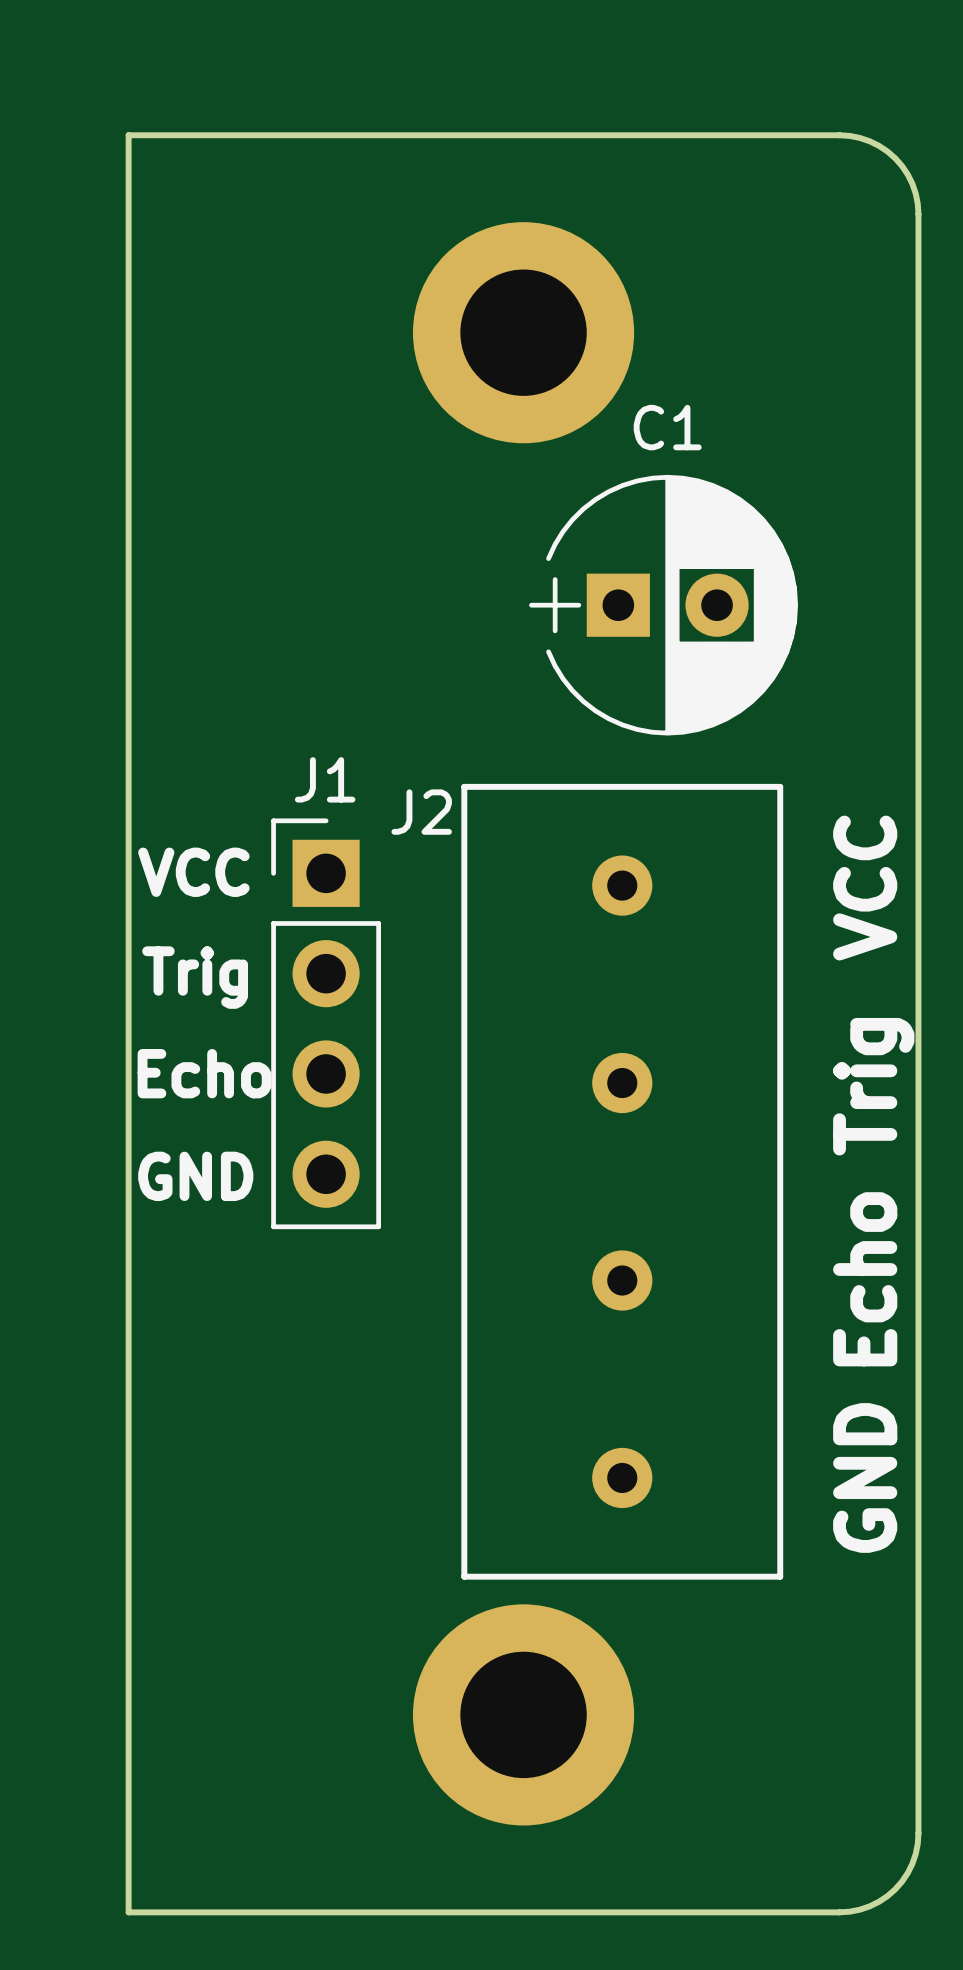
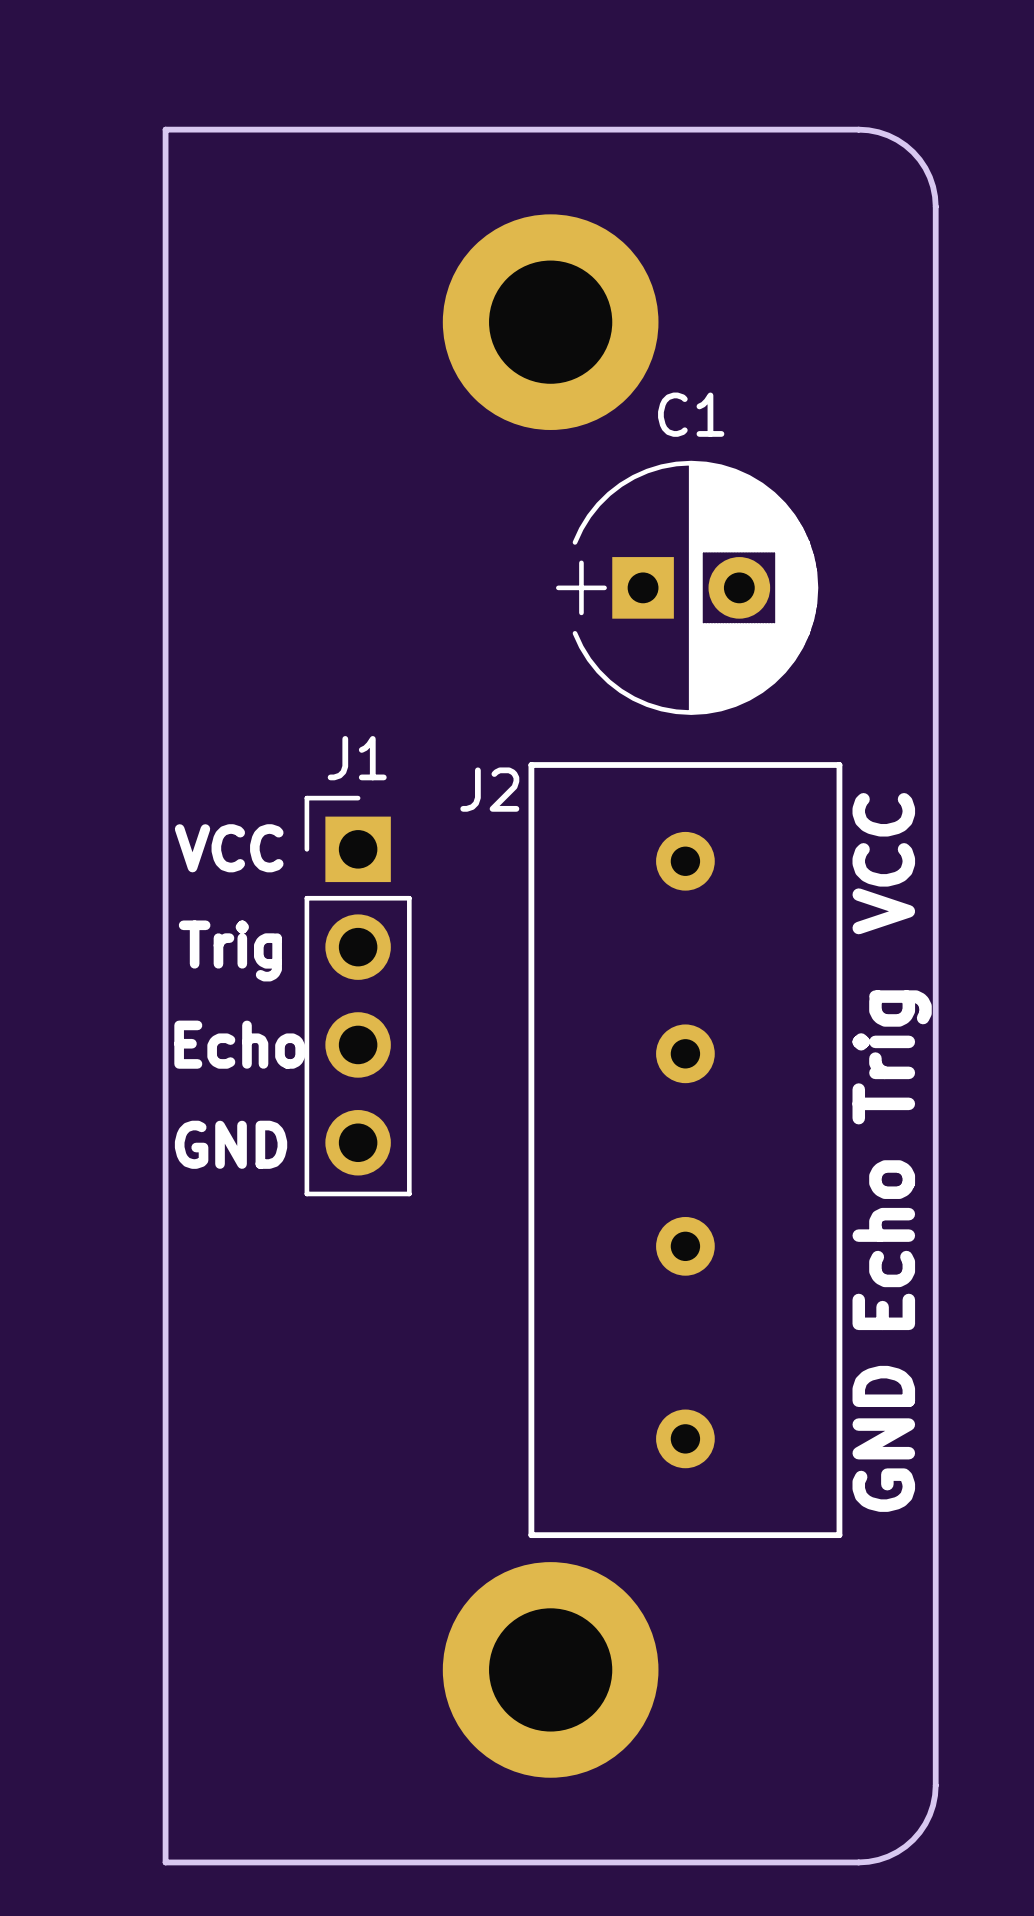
J2 position: (622, 1181) -> (685, 1150)

